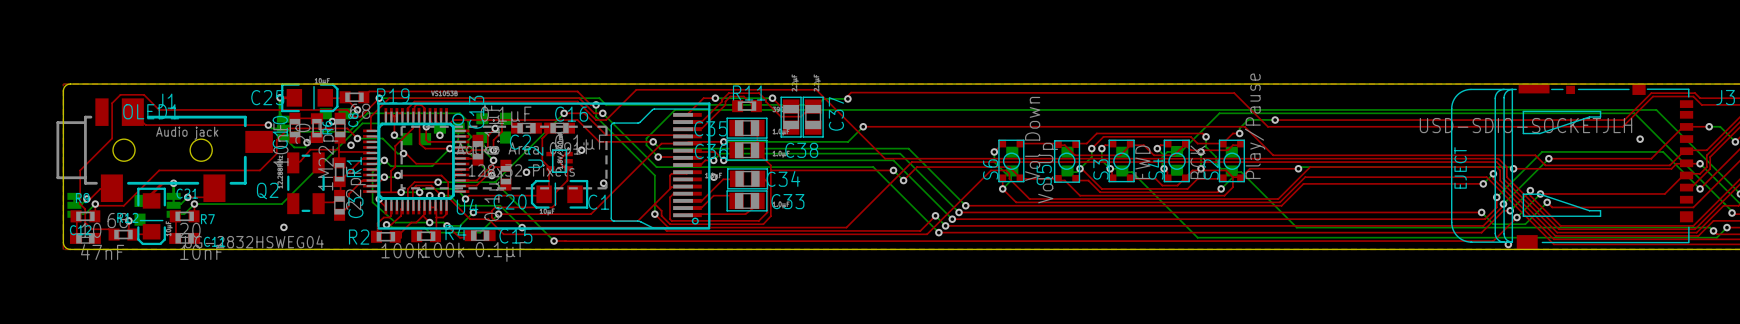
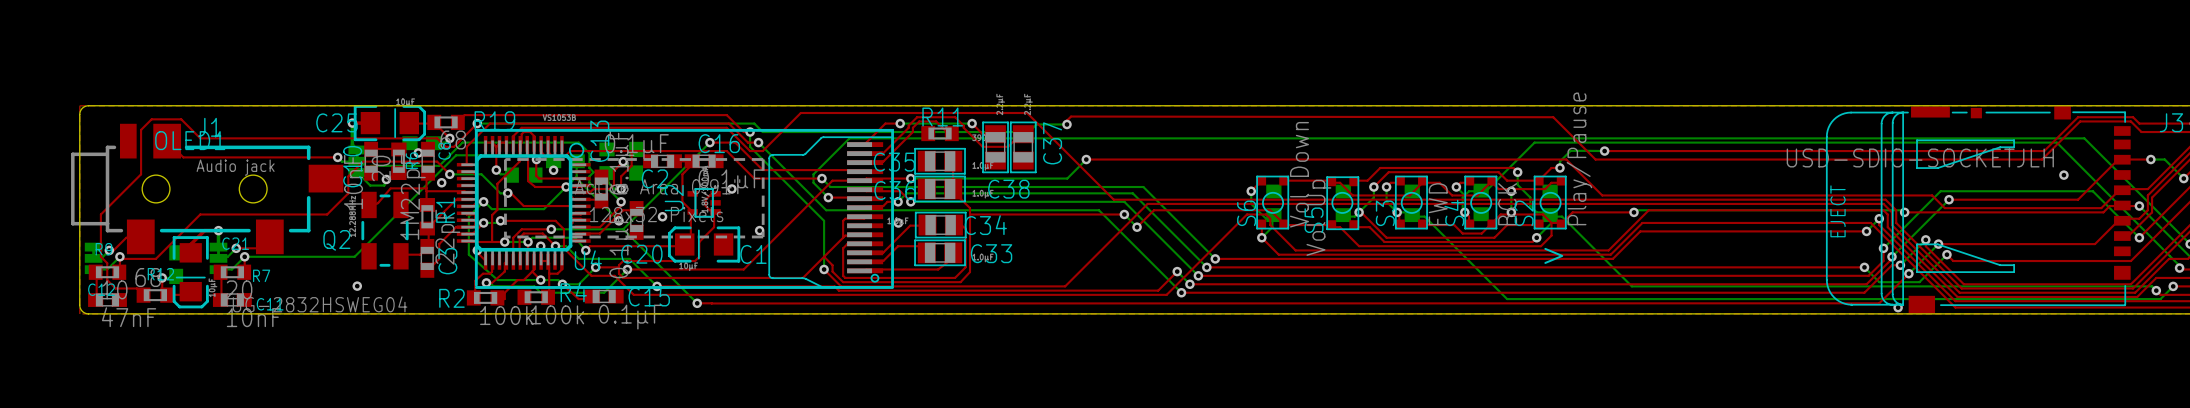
text: none -> > (1553, 255)

